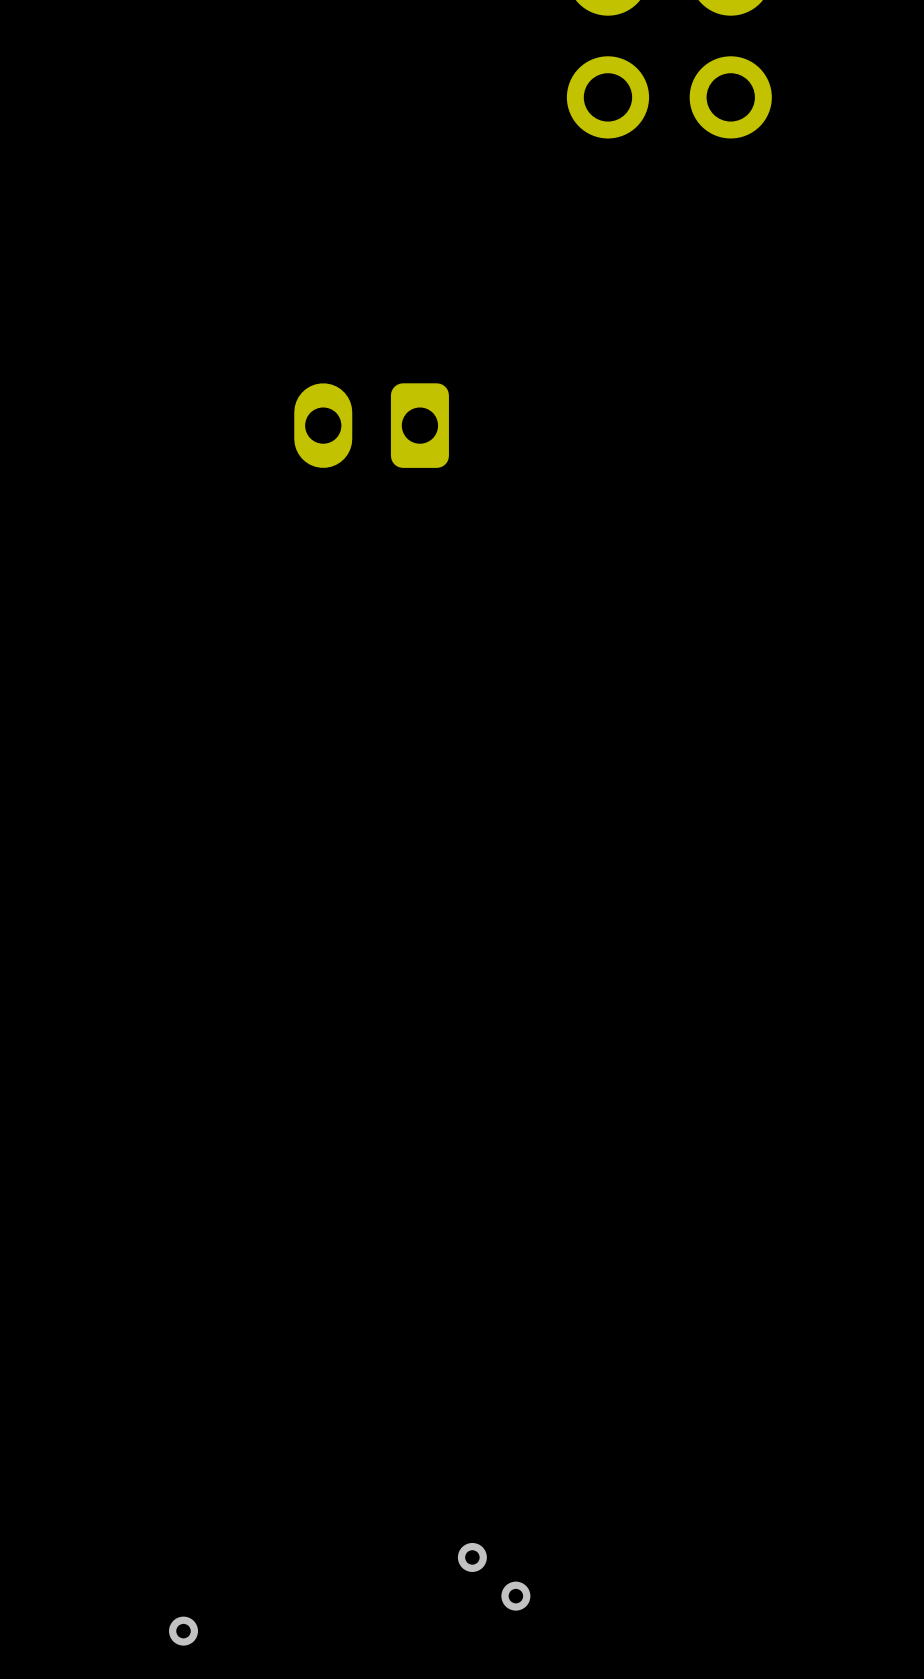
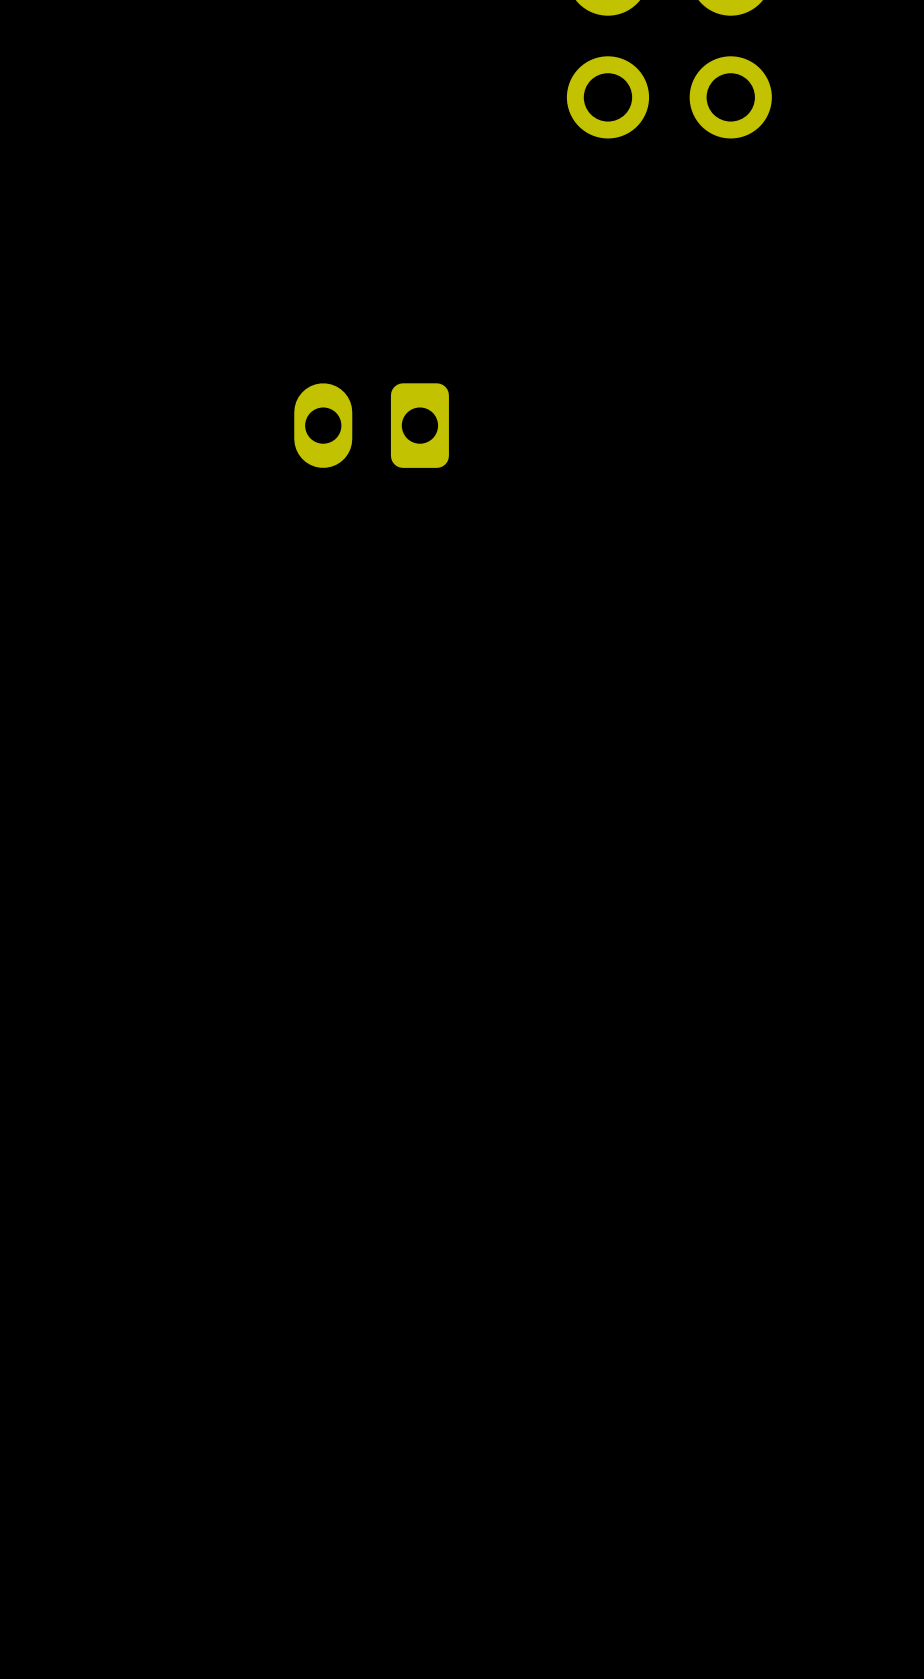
via: (472, 1557) -> none
via: (515, 1596) -> none
via: (183, 1631) -> none

